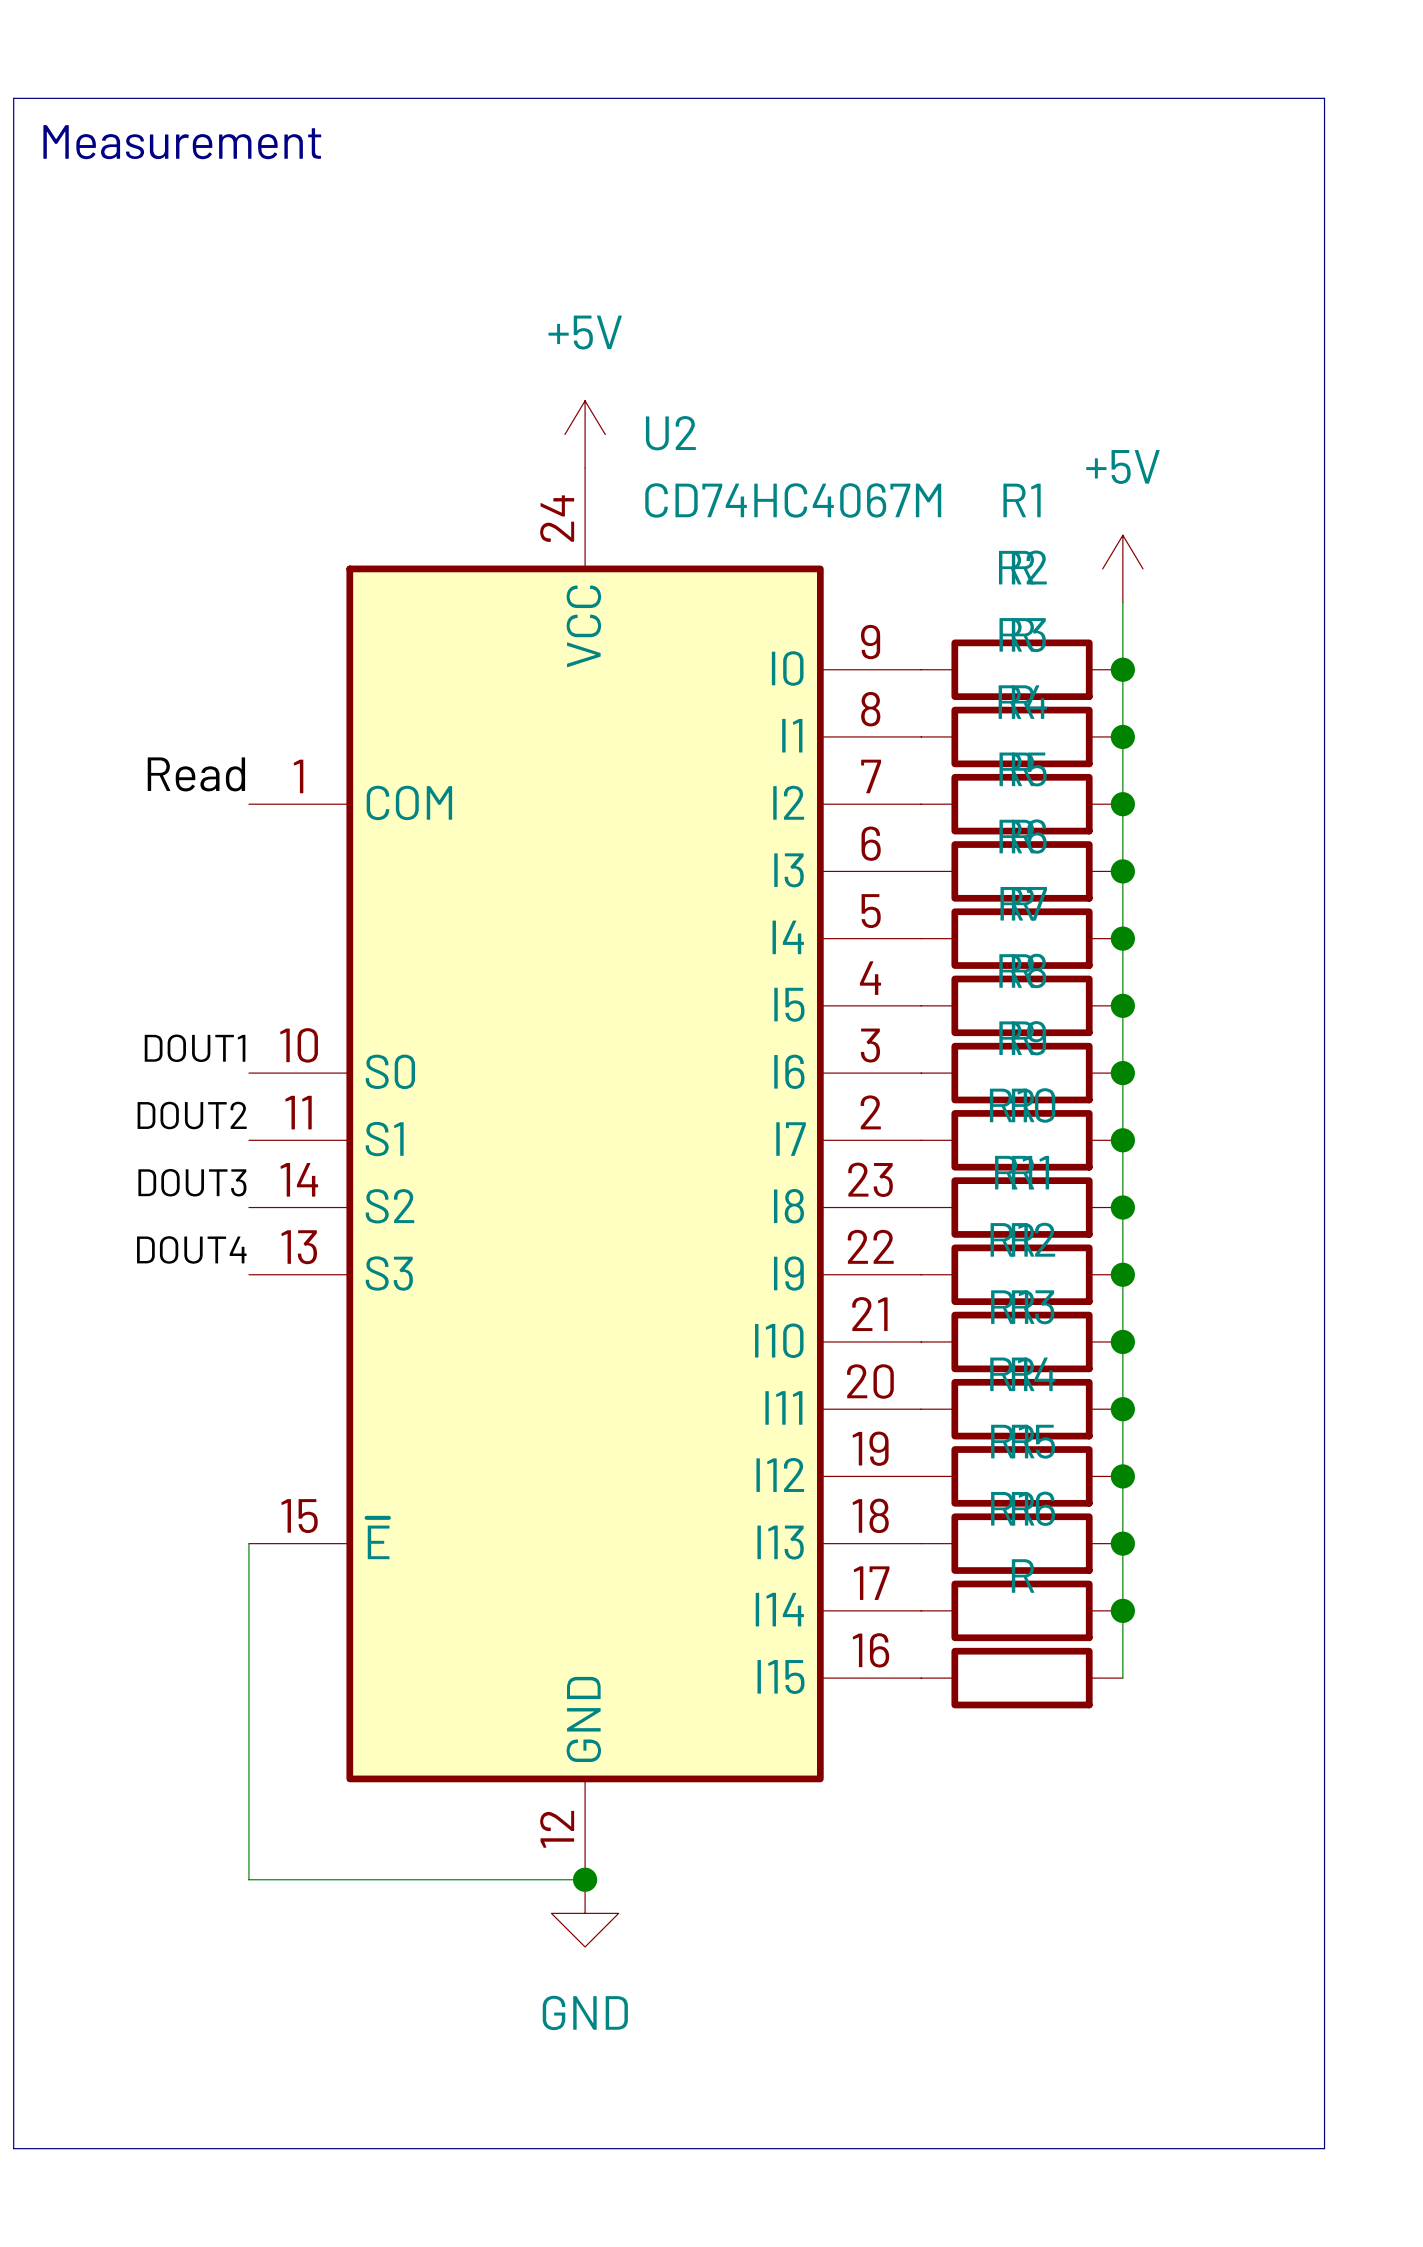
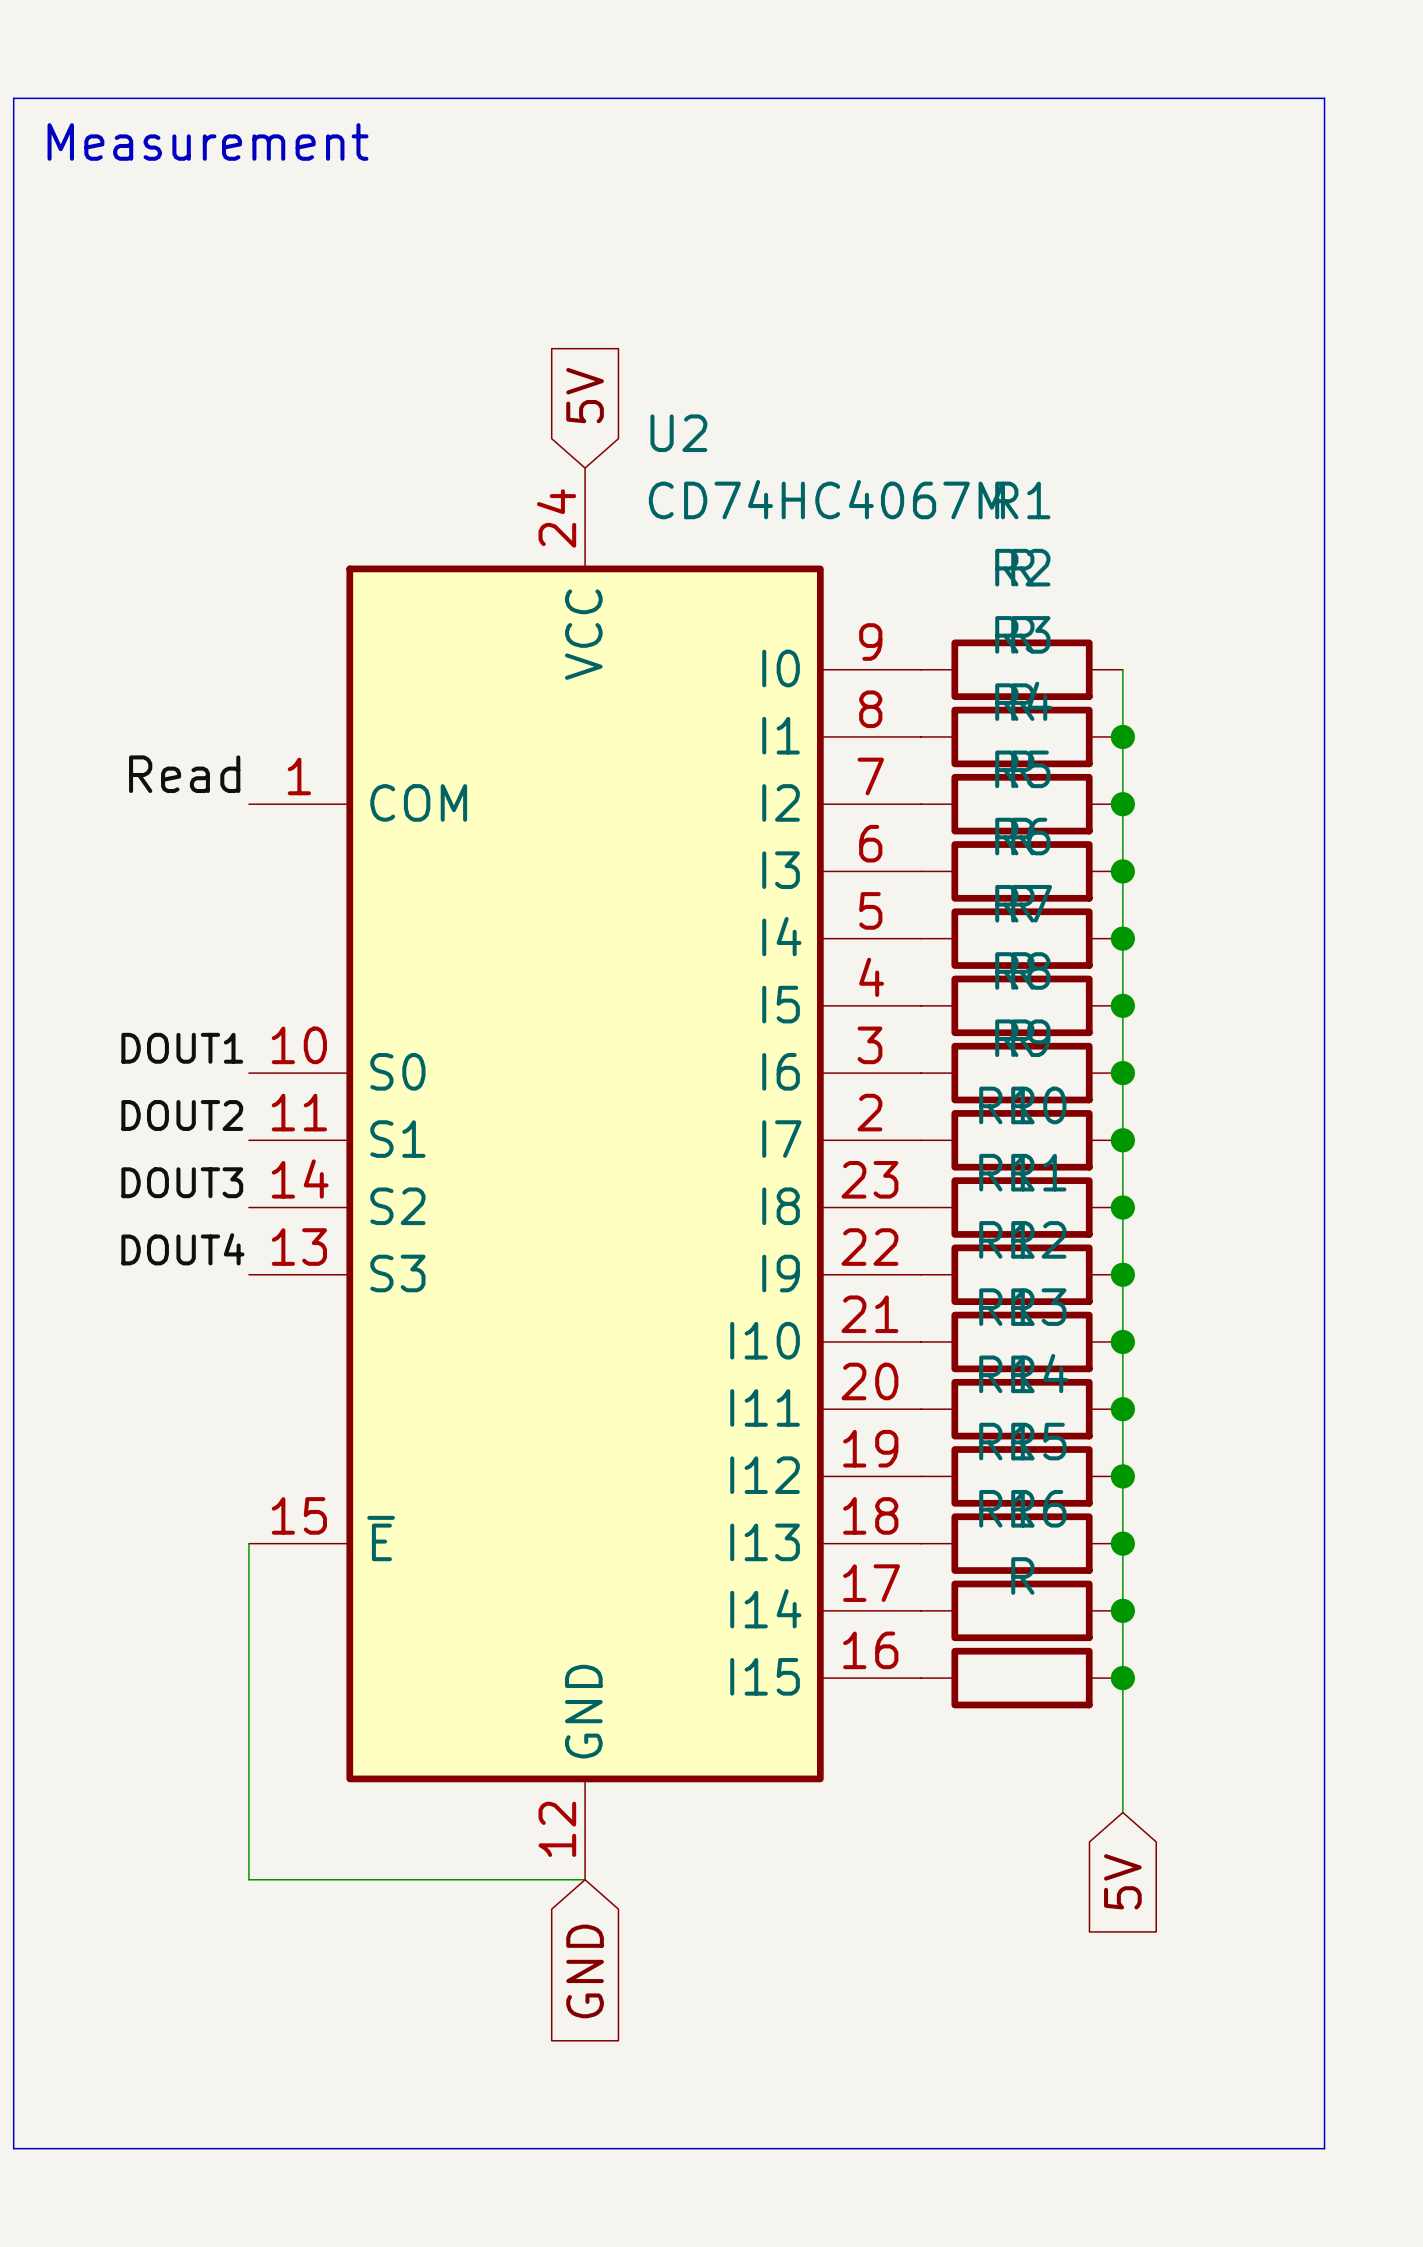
global label: none -> 5V (585, 395)
power symbol: +5V (585, 434) -> none
power symbol: +5V (1122, 568) -> none
wire: (1122, 602) (1122, 669) -> none
junction: (1122, 669) -> none
wire: none -> (1122, 1678) (1122, 1812)
junction: none -> (1122, 1678)
global label: none -> 5V (1122, 1881)
junction: (585, 1879) -> none
power symbol: GND (585, 1913) -> none
global label: none -> GND (585, 1971)

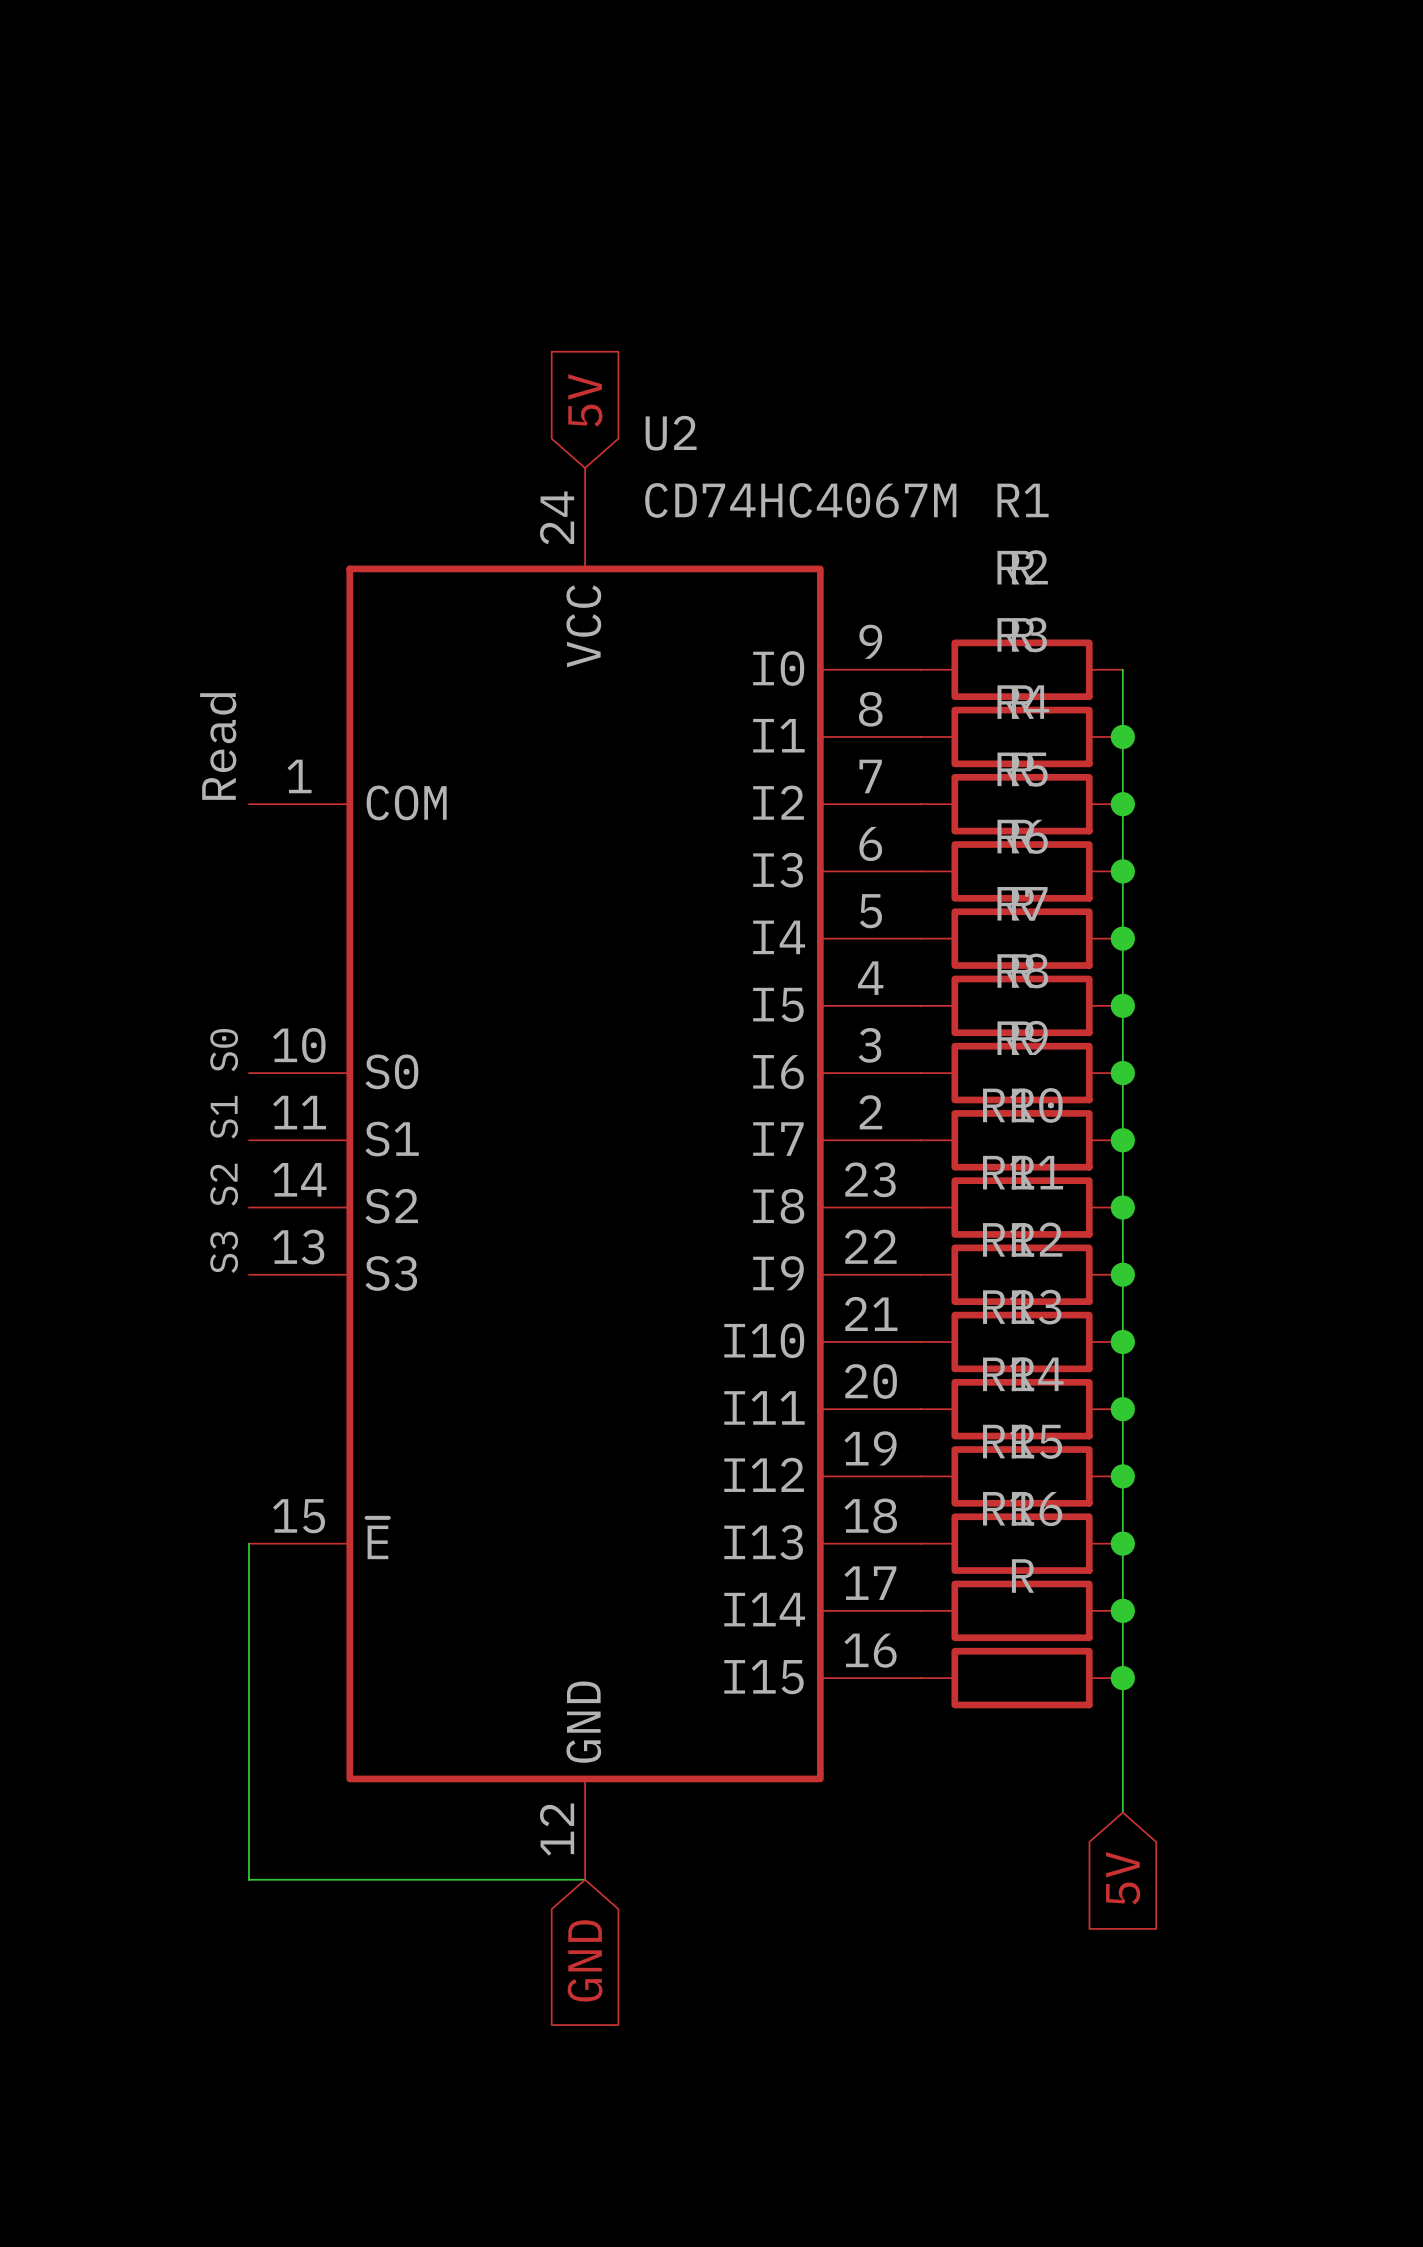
line: (13, 98) (1324, 98) (1324, 2148) (13, 2148) (13, 98) -> none
text: Measurement (208, 141) -> none
label rotation: 0° (184, 774) -> 90° counterclockwise (218, 746)
label: DOUT1 (182, 1048) -> S0 (224, 1050)
label: DOUT2 (182, 1115) -> S1 (224, 1117)
label: DOUT3 (182, 1182) -> S2 (224, 1184)
label: DOUT4 (182, 1249) -> S3 (224, 1252)

